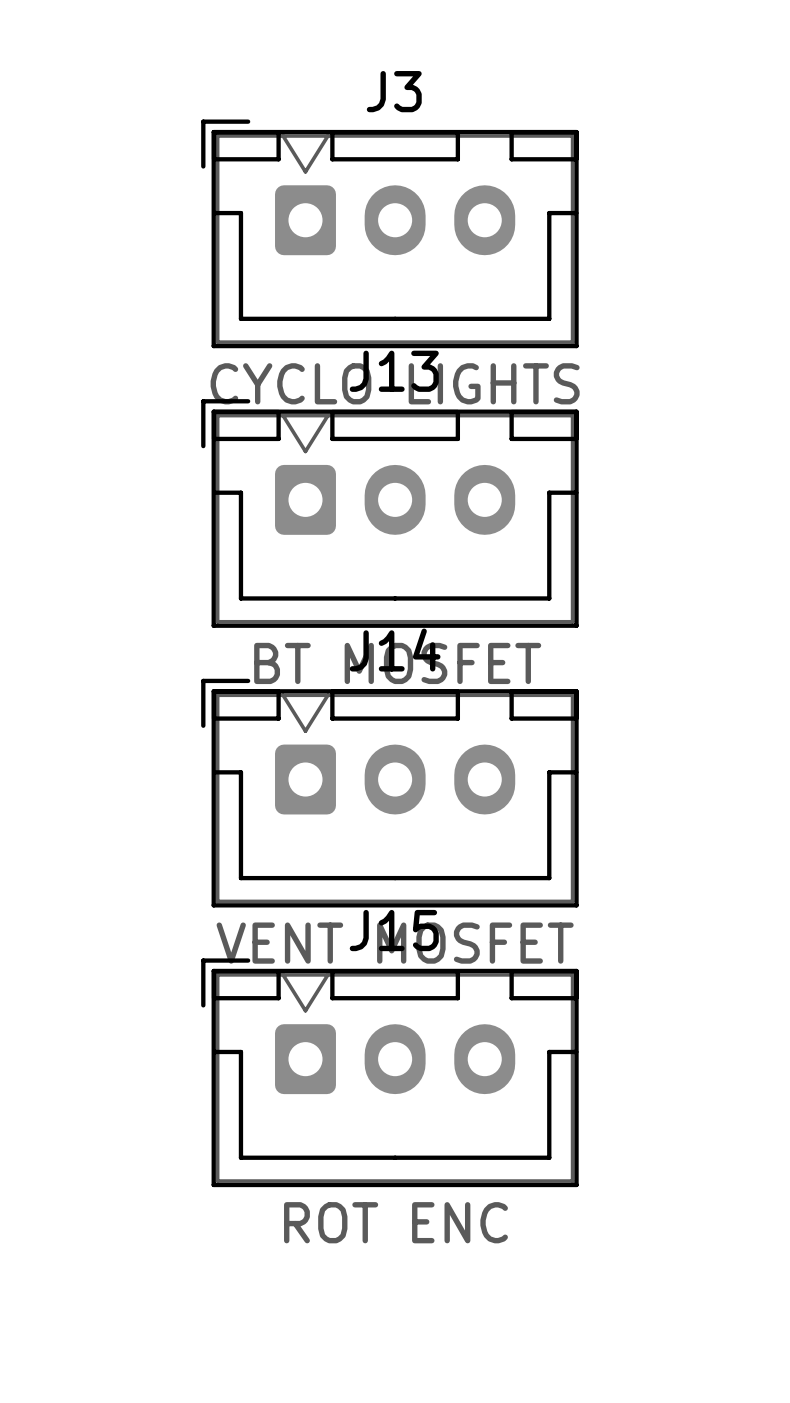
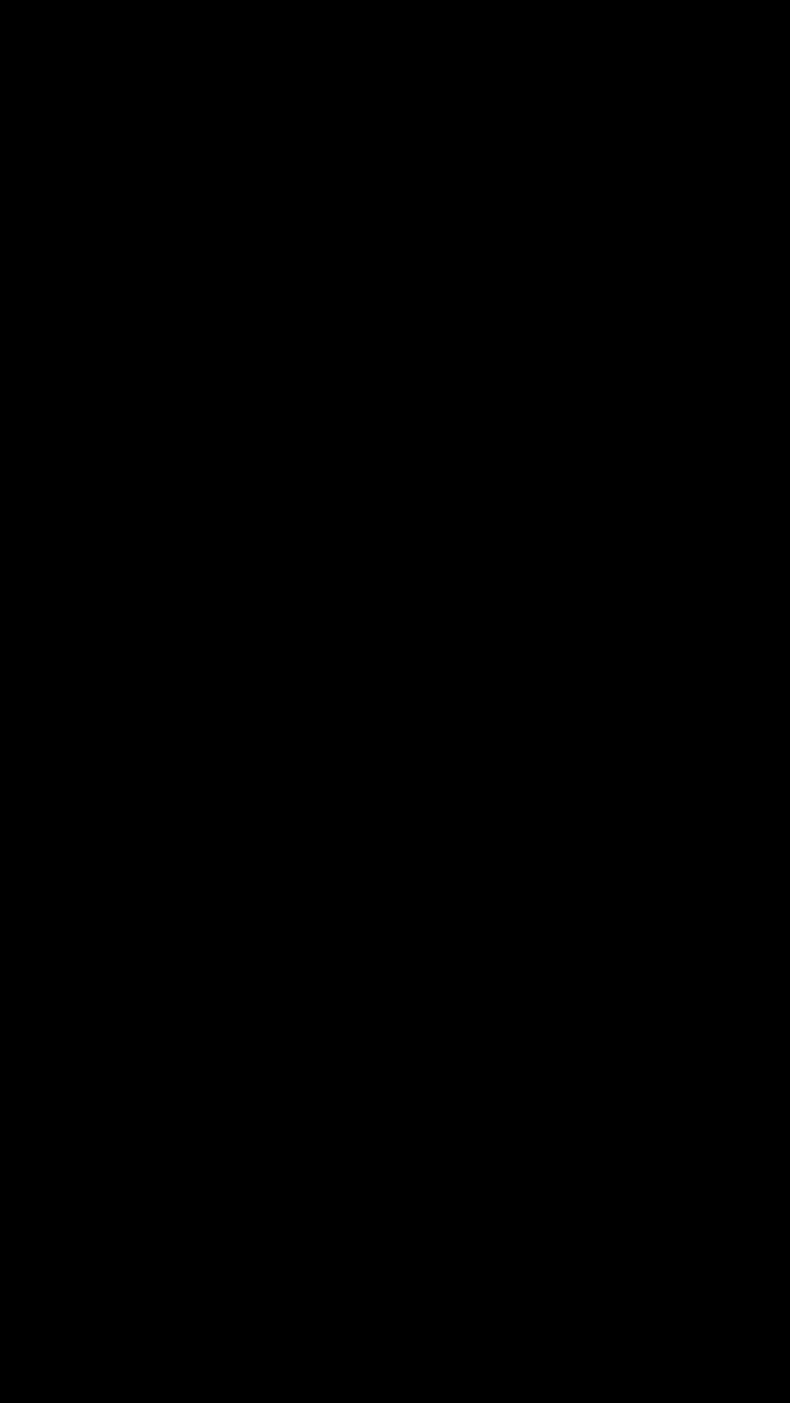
J3: CYCLO LIGHTS (389, 233) -> none
J13: BT MOSFET (389, 513) -> none
J14: VENT MOSFET (389, 793) -> none
J15: ROT ENC (389, 1072) -> none

